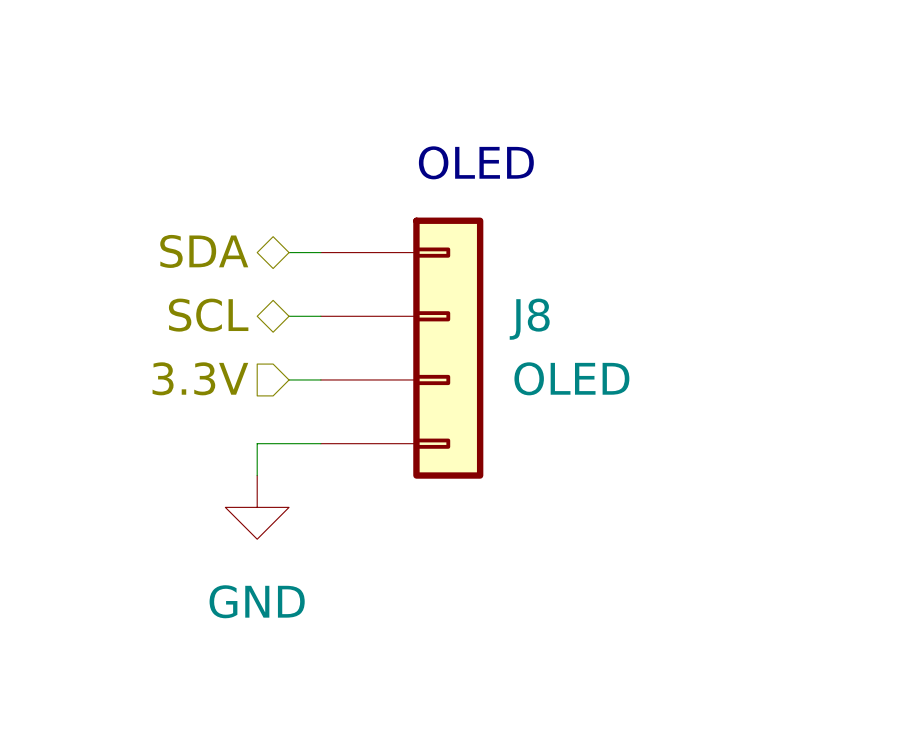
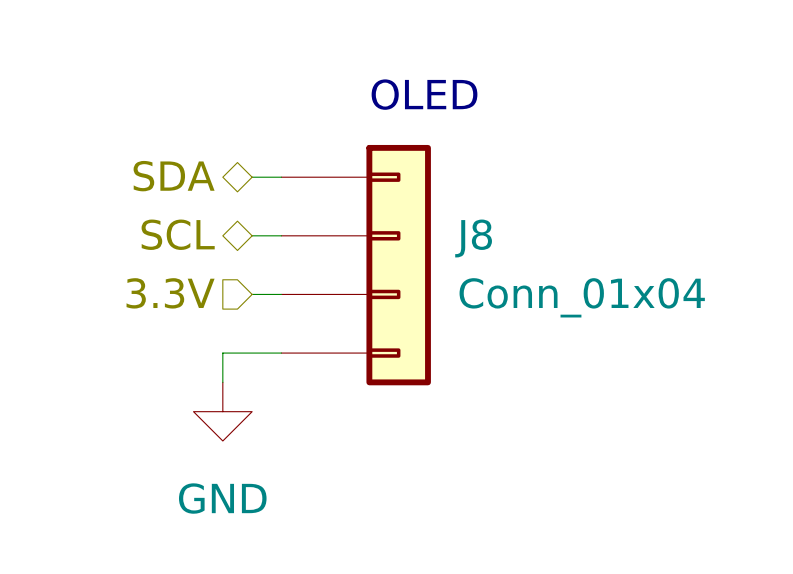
J8 value: OLED (571, 378) -> Conn_01x04 (582, 297)

